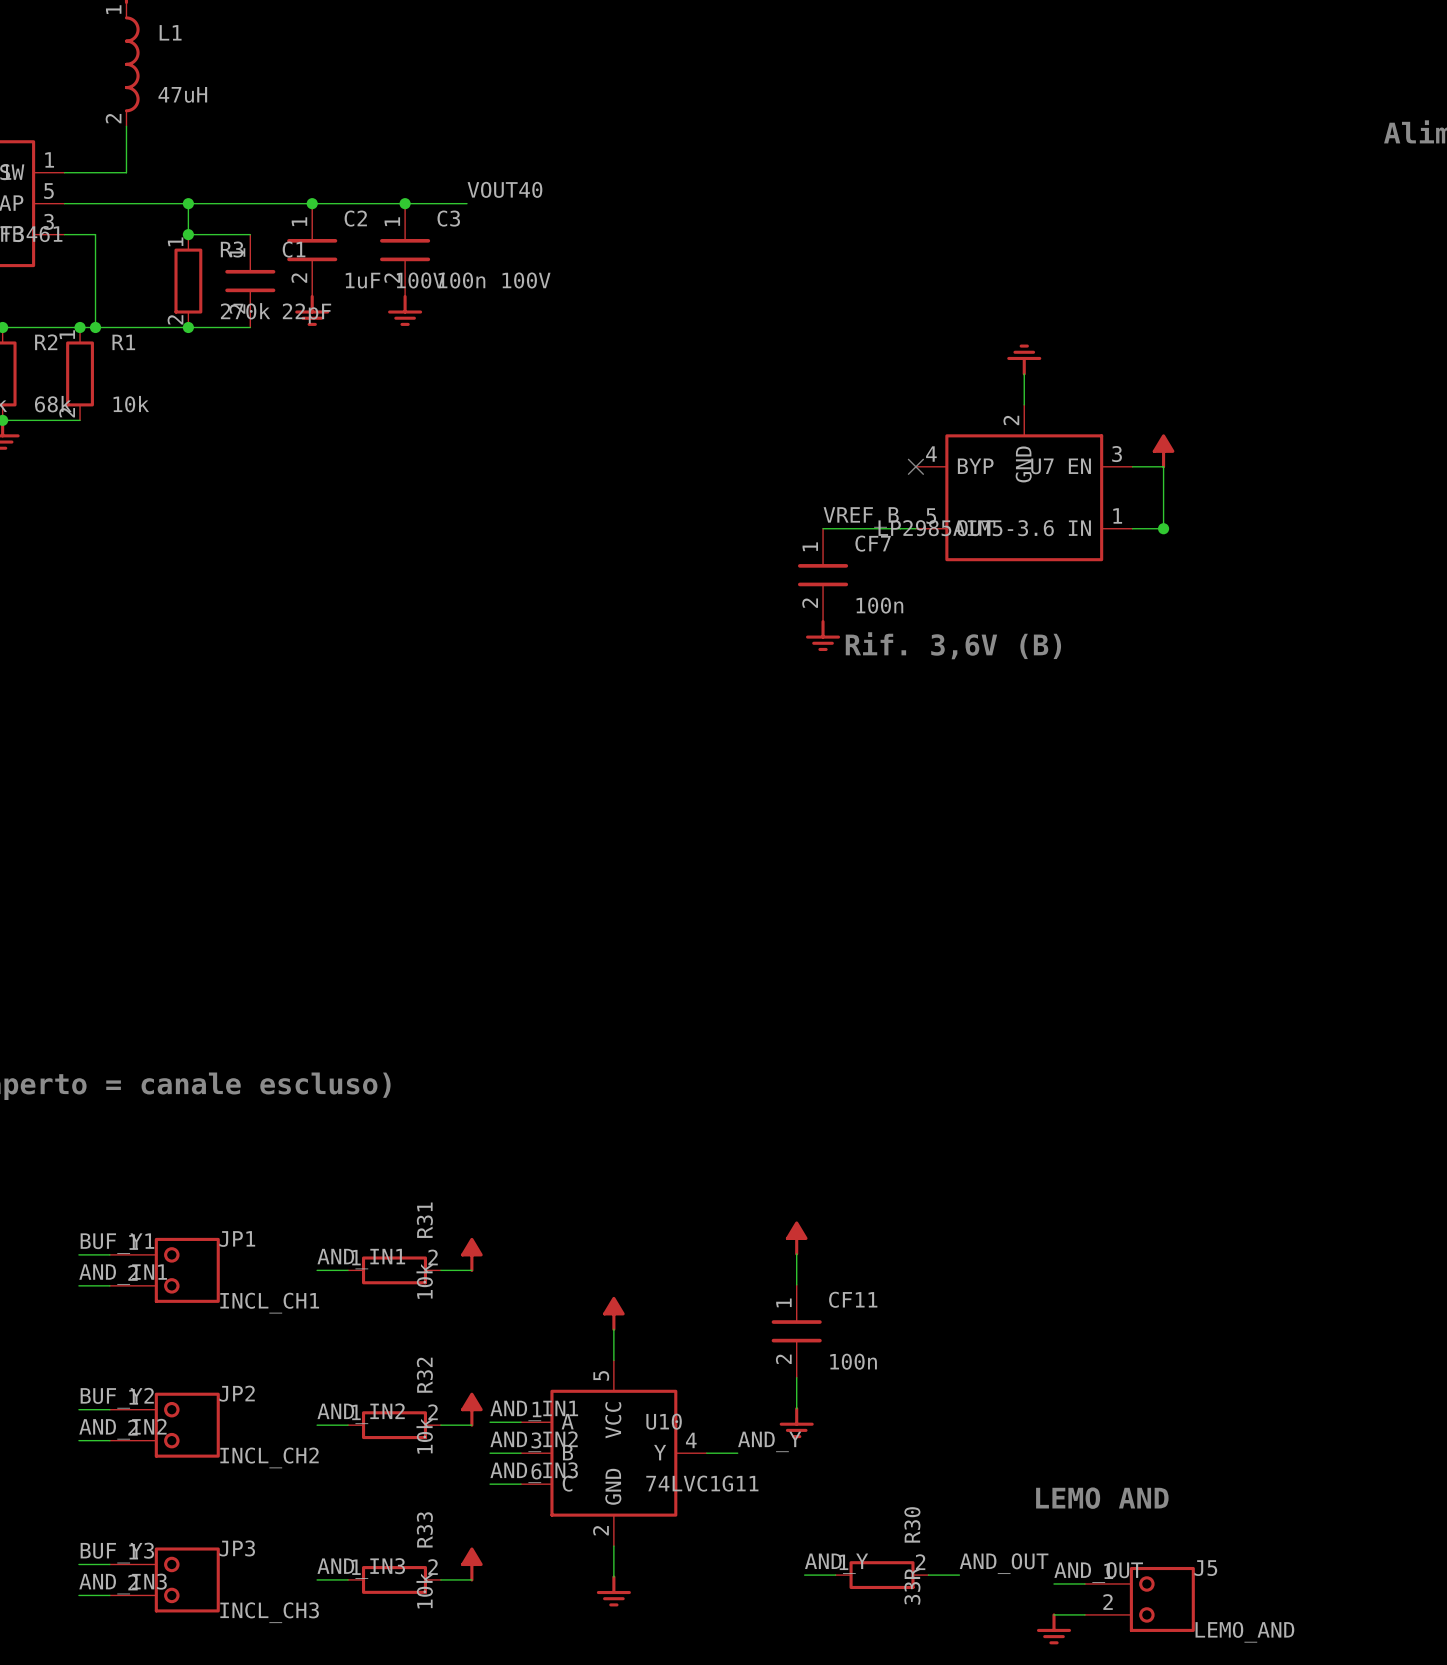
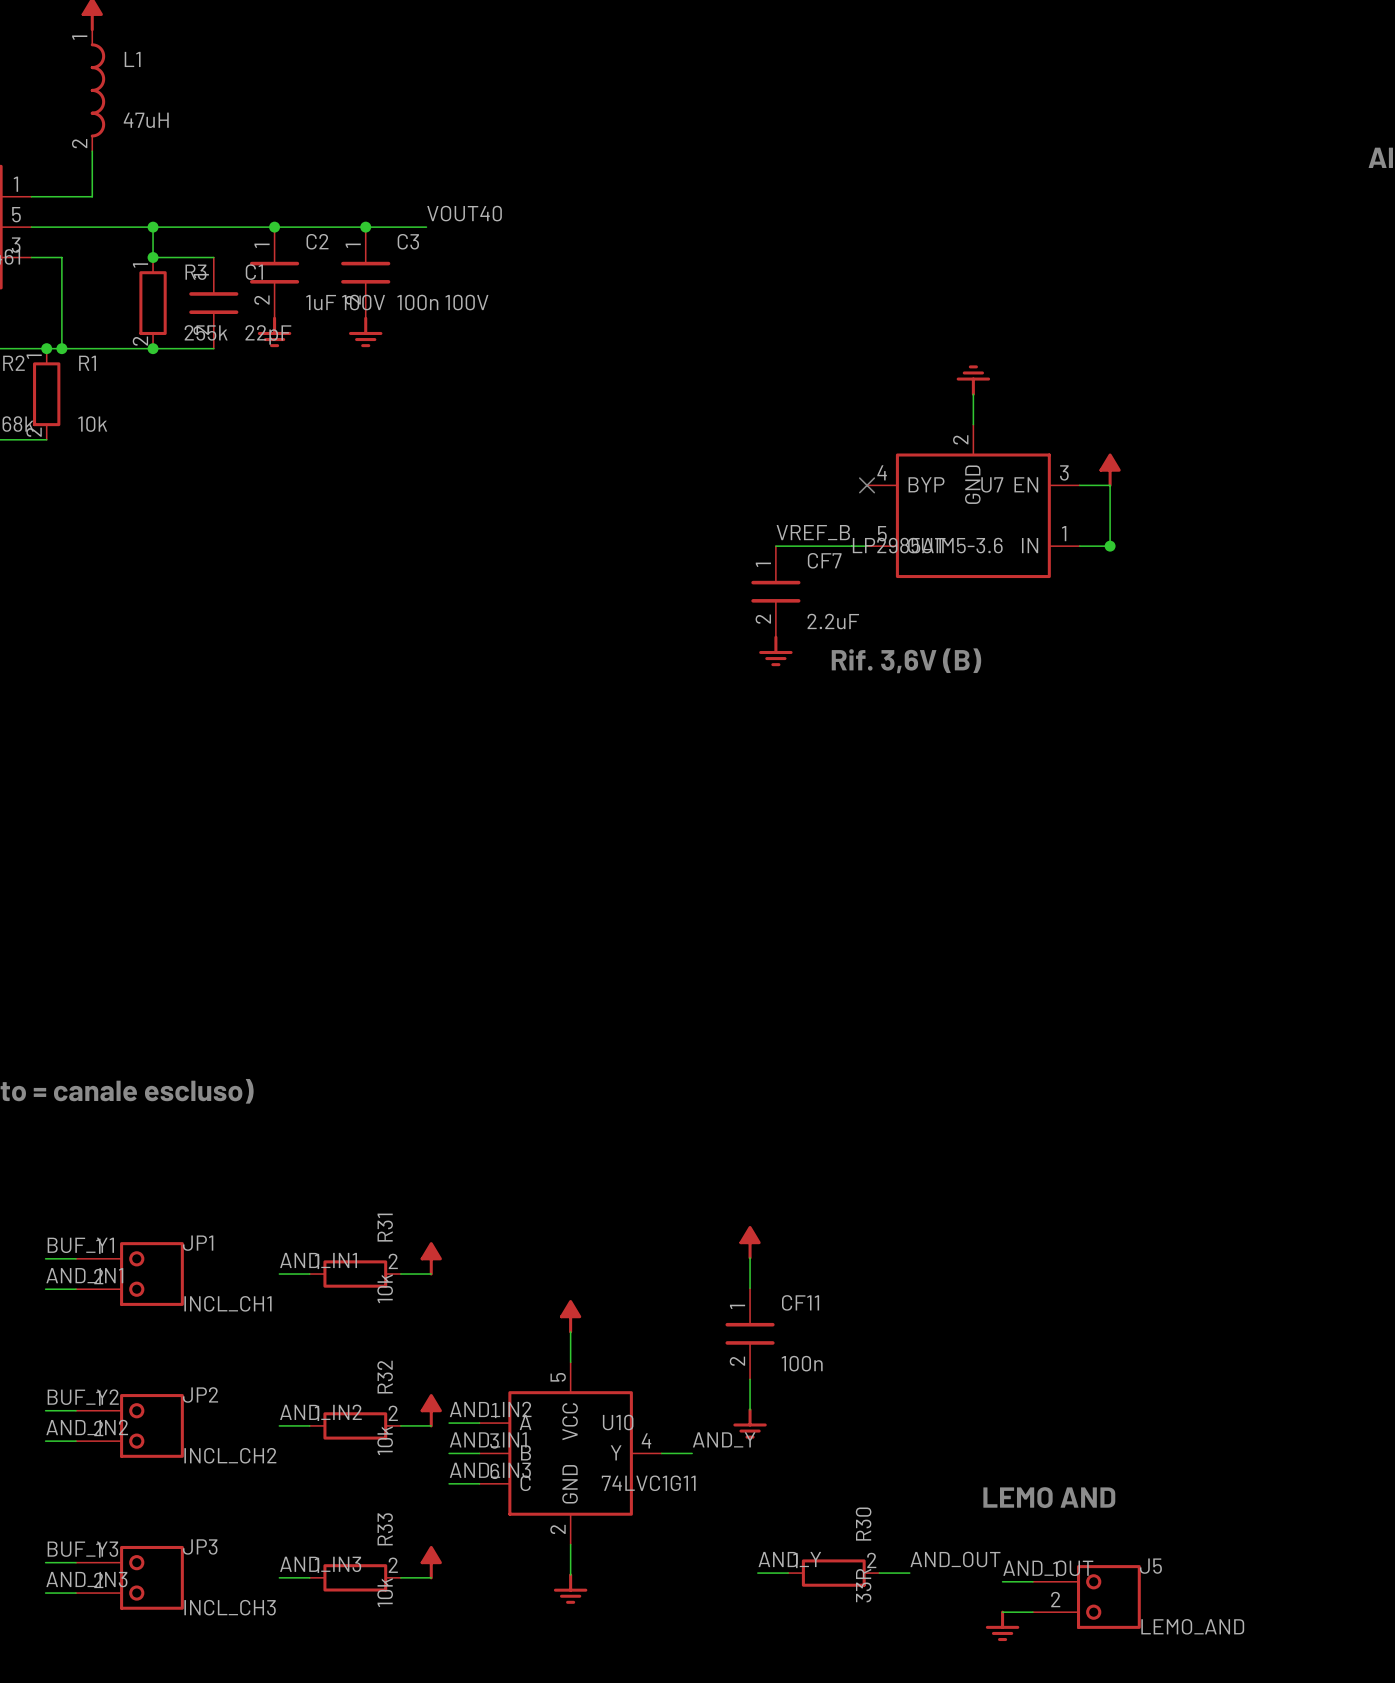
R3 value: 270k (245, 311) -> 255k (206, 332)
CF7 value: 100n (879, 605) -> 2.2uF (833, 621)
label: AND_IN1 (534, 1410) -> AND_IN2 (490, 1409)
label: AND_IN2 (534, 1441) -> AND_IN1 (488, 1439)

